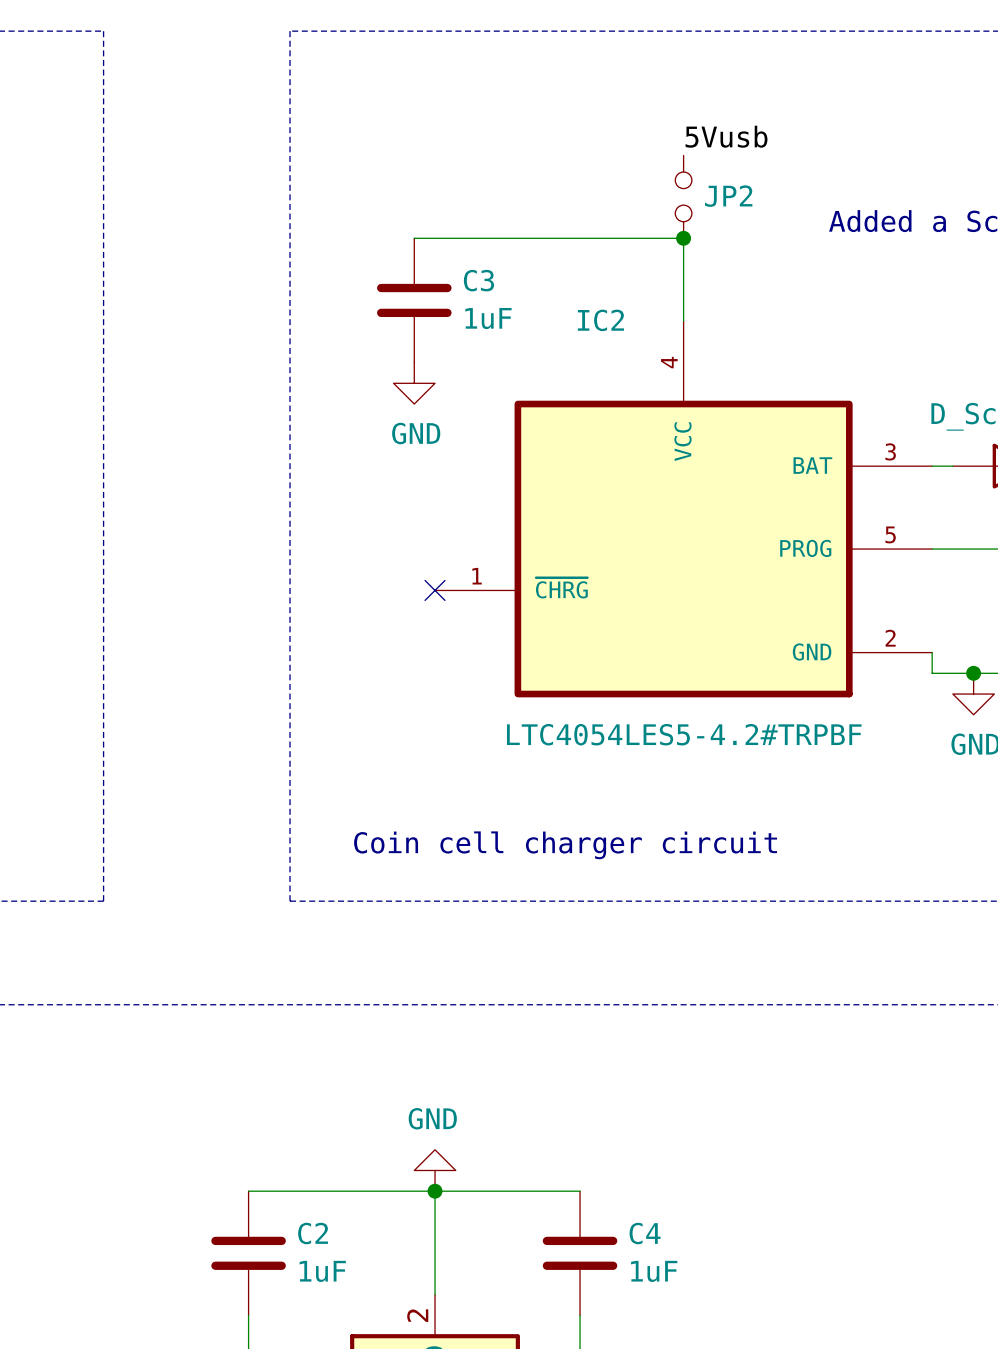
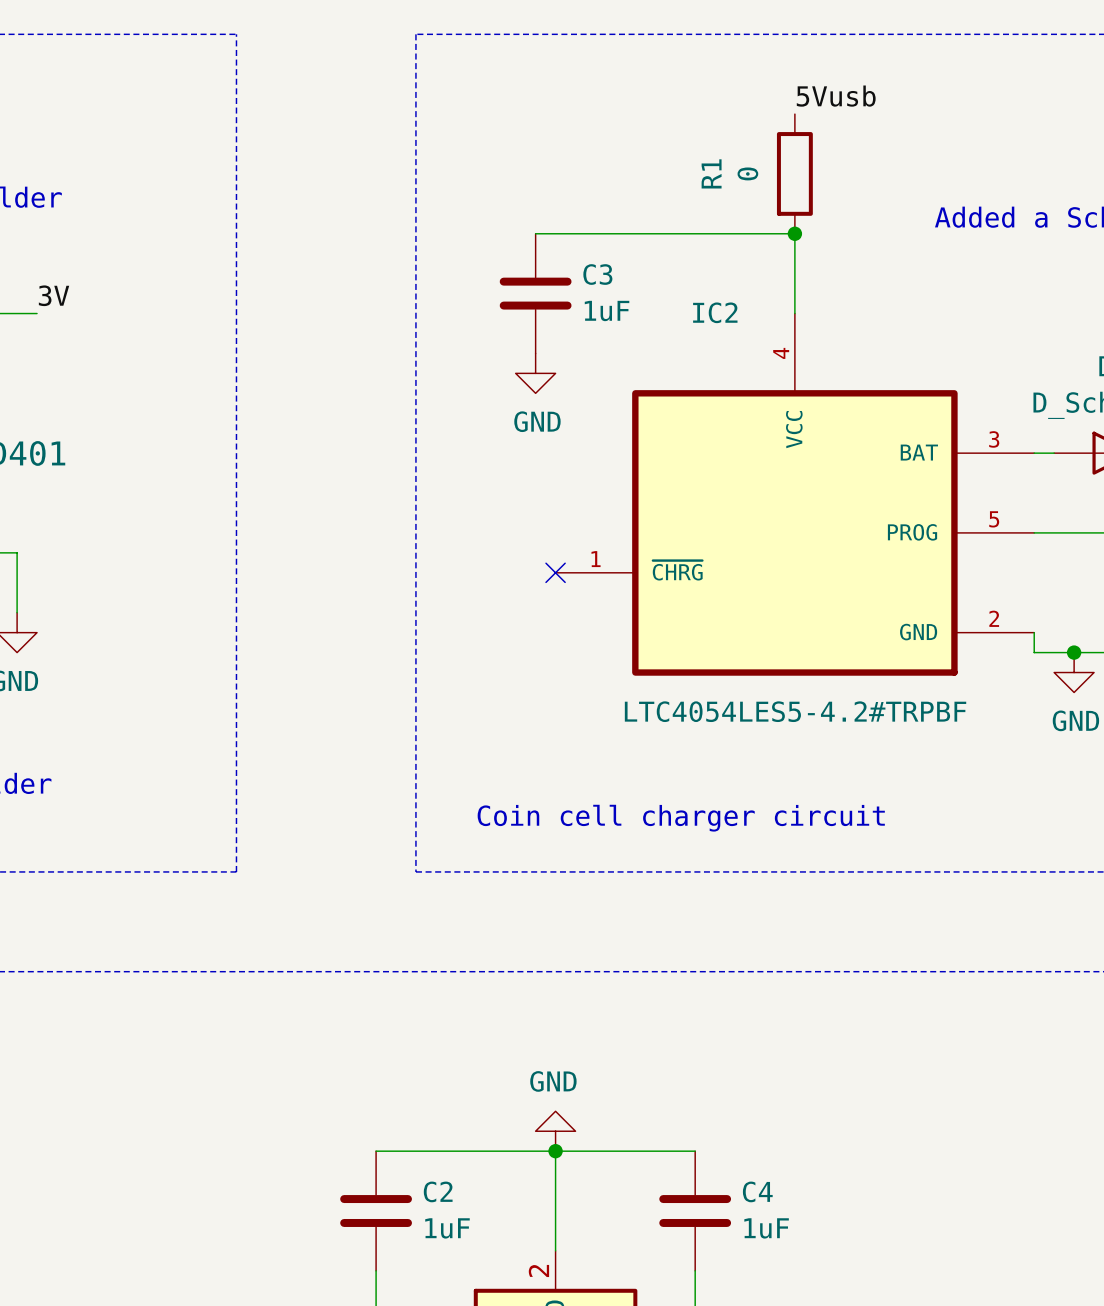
label position: 5Vusb (726, 136) -> 5Vusb (836, 96)
R1: none -> 0 (794, 173)
JP2: (683, 196) -> none

